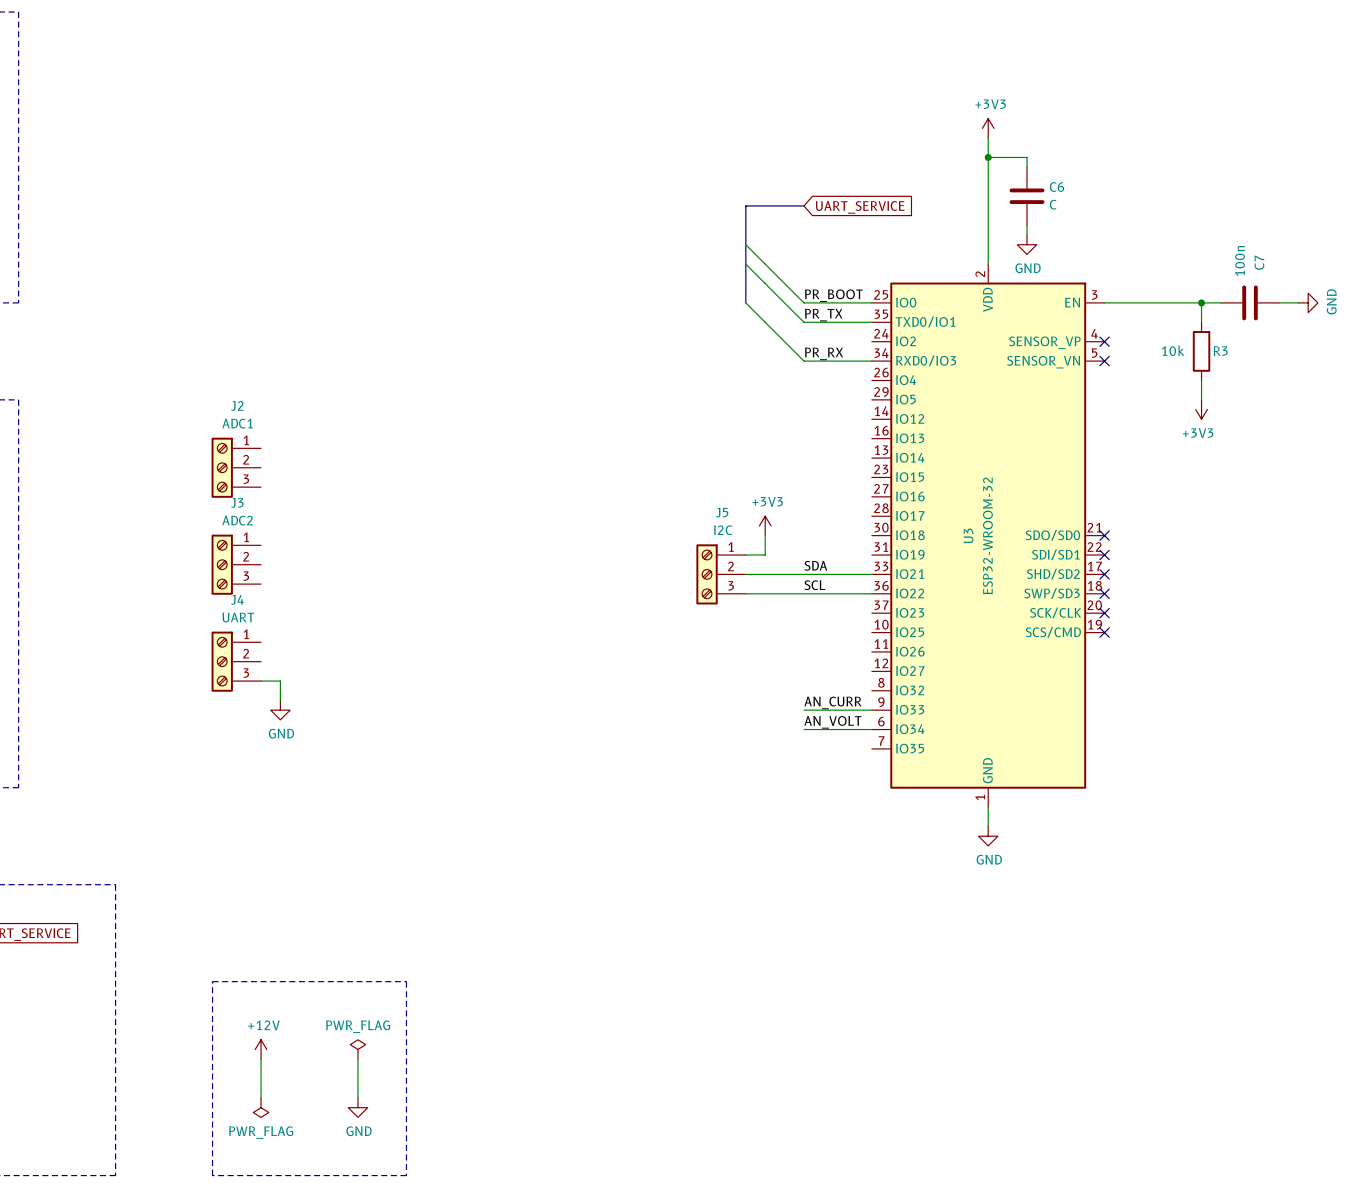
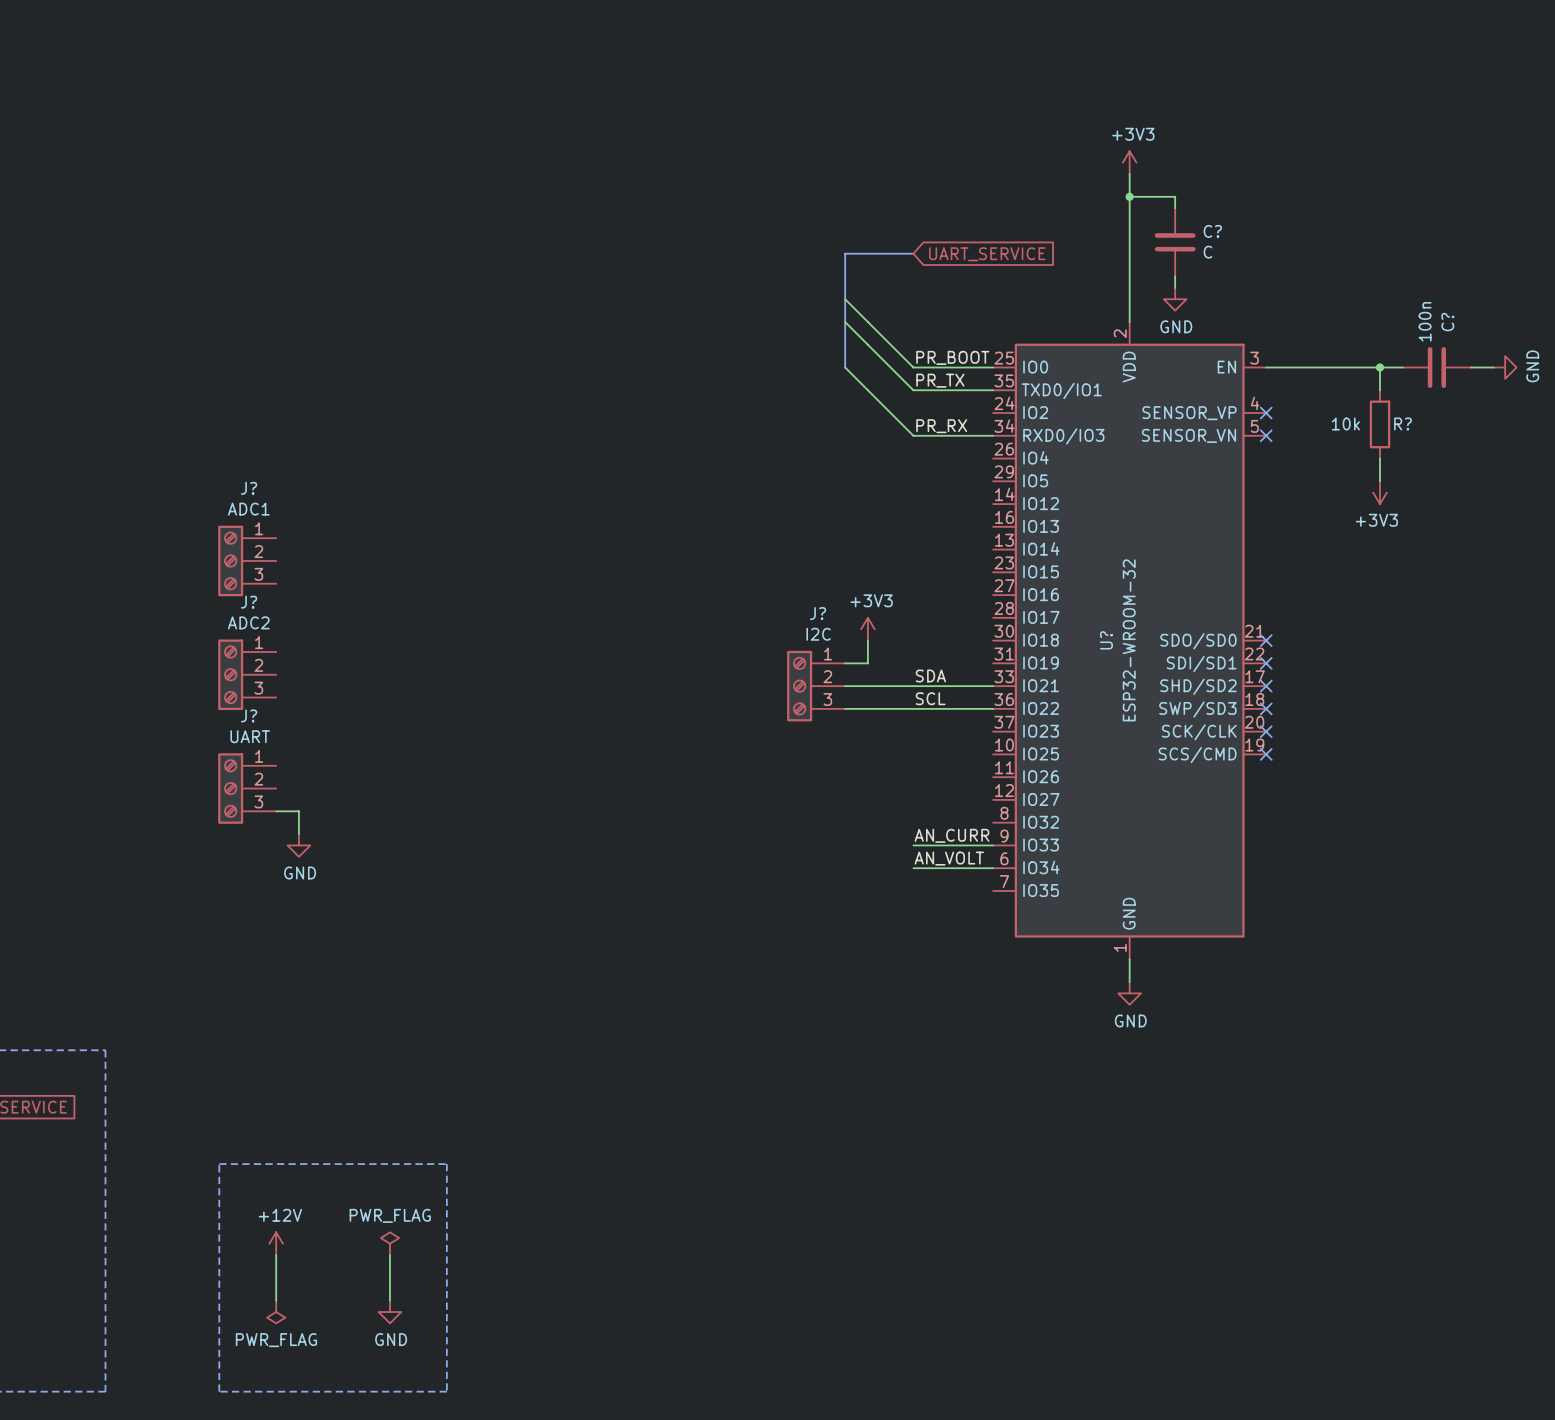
C6 name: C6 (1057, 187) -> C? (1212, 231)
C7 name: C7 (1259, 262) -> C? (1447, 322)
R3 name: R3 (1220, 351) -> R? (1403, 423)
J2 name: J2 (237, 405) -> J? (249, 488)
J3 name: J3 (237, 502) -> J? (249, 602)
J5 name: J5 (722, 512) -> J? (818, 613)
U3 name: U3 (968, 535) -> U? (1106, 640)
J4 name: J4 (237, 599) -> J? (249, 715)

